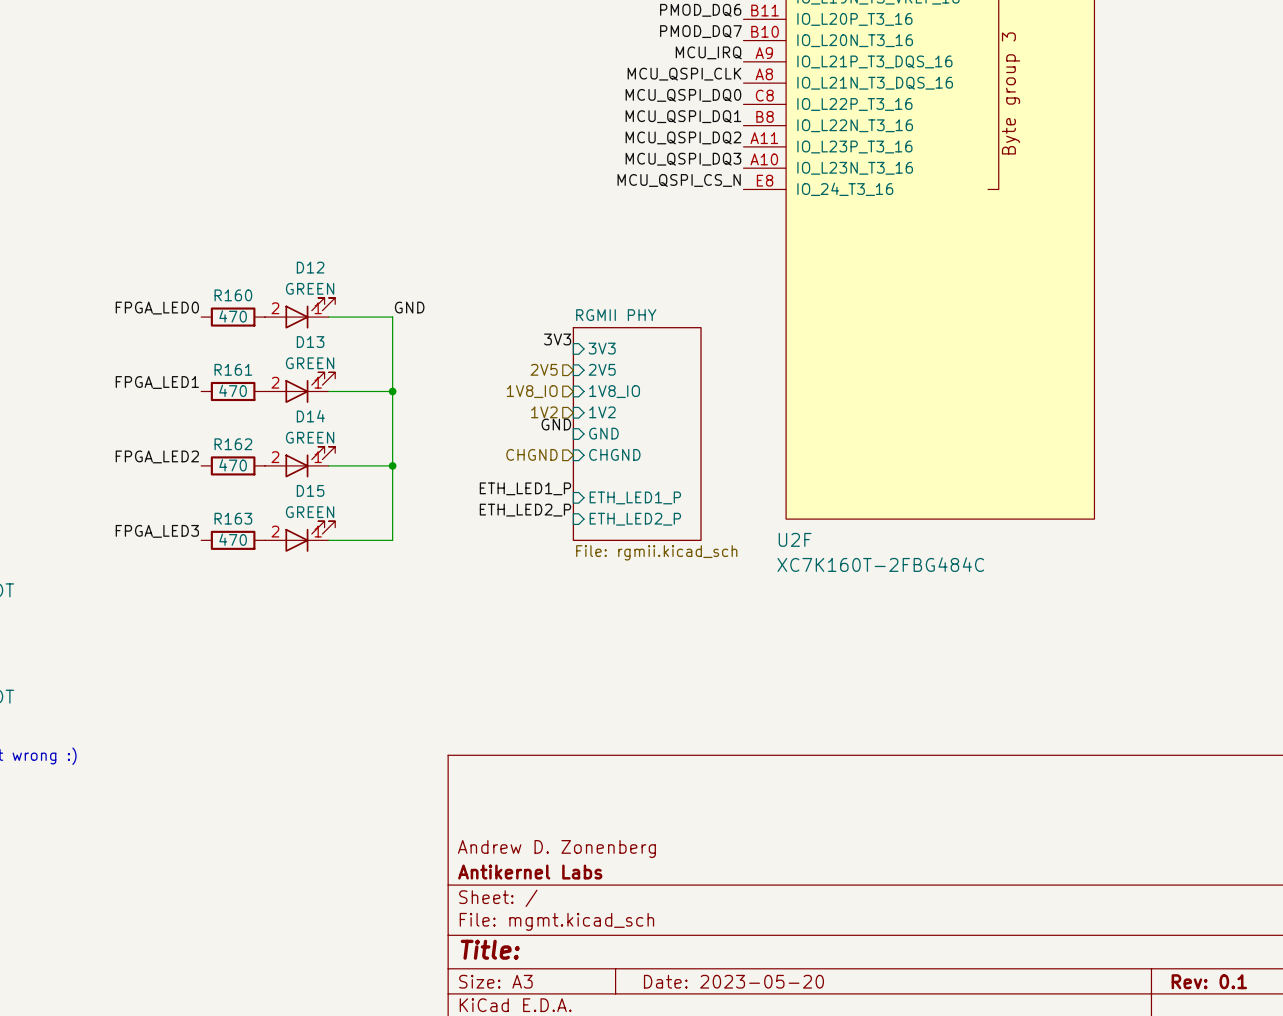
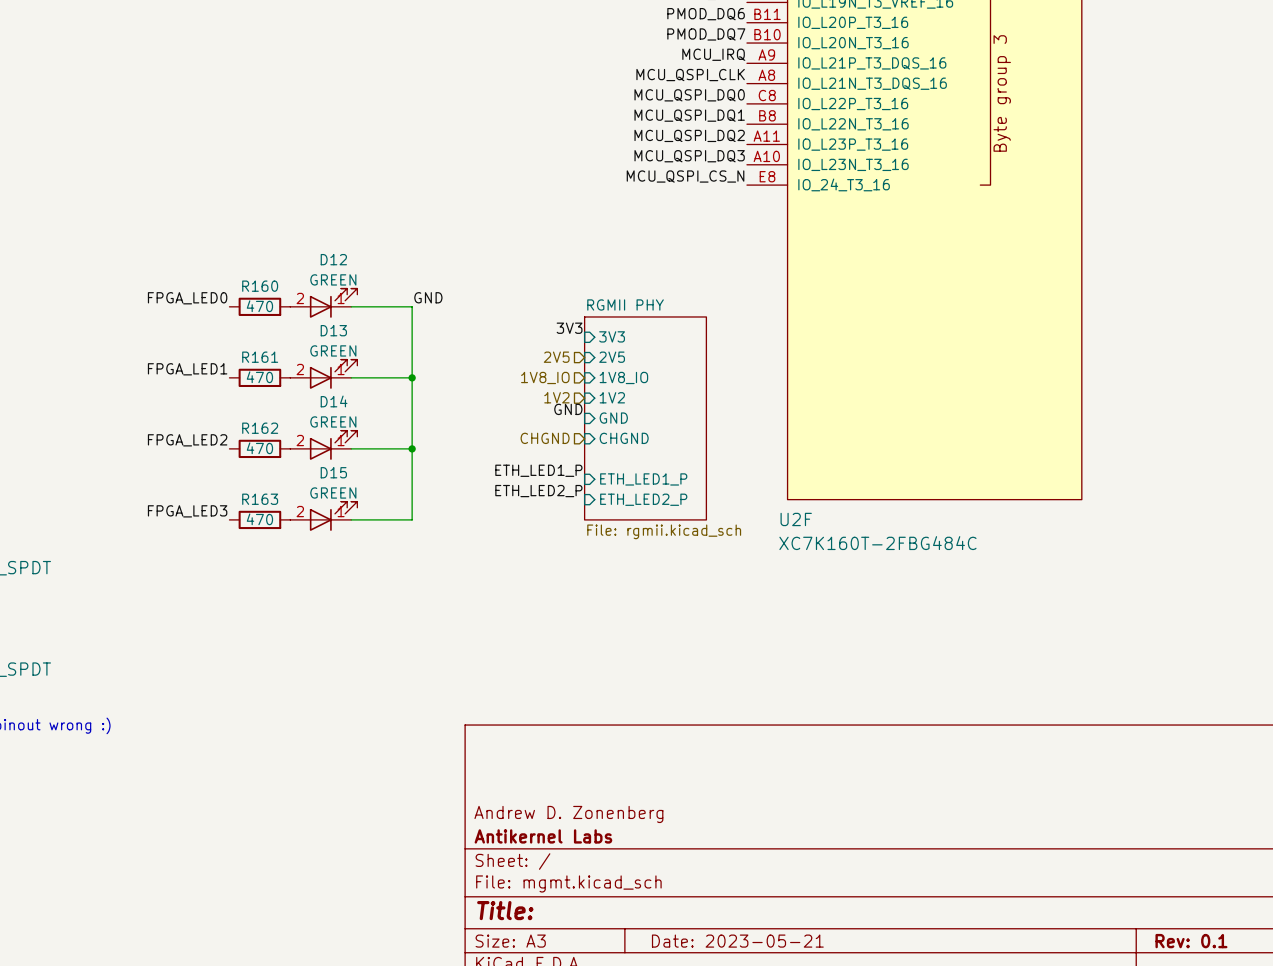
title block: Date: 2023-05-20 (733, 981) -> Date: 2023-05-21 (737, 941)

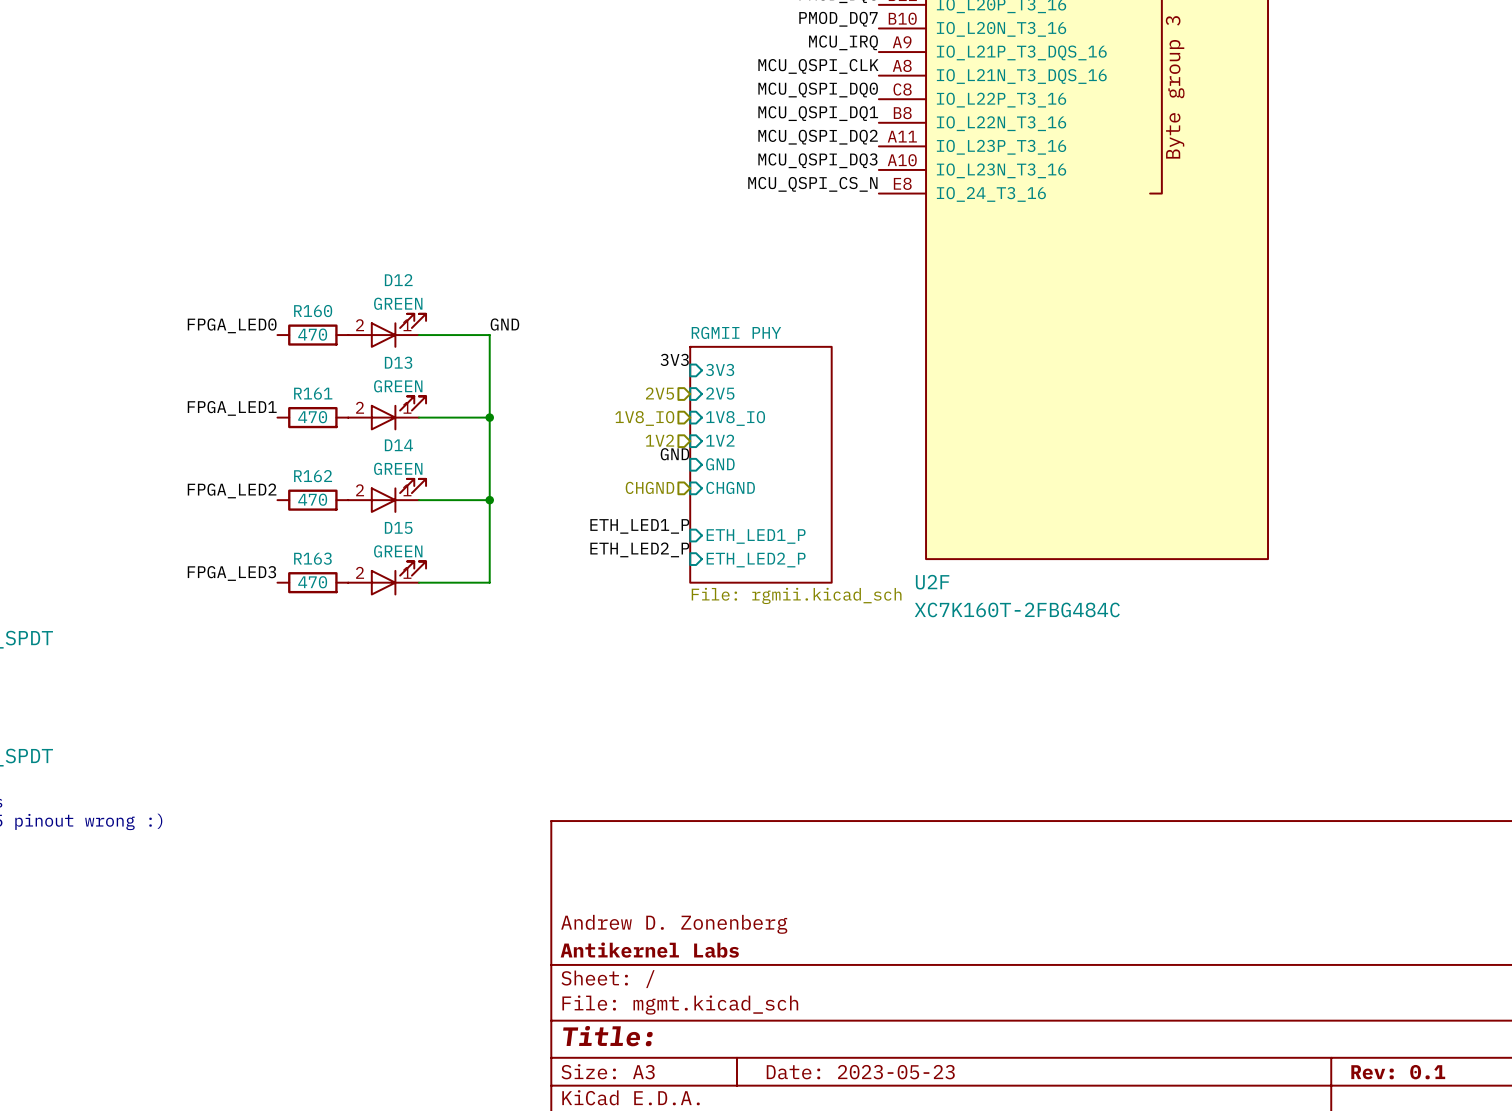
title block: Date: 2023-05-21 (737, 941) -> Date: 2023-05-23 (860, 1072)

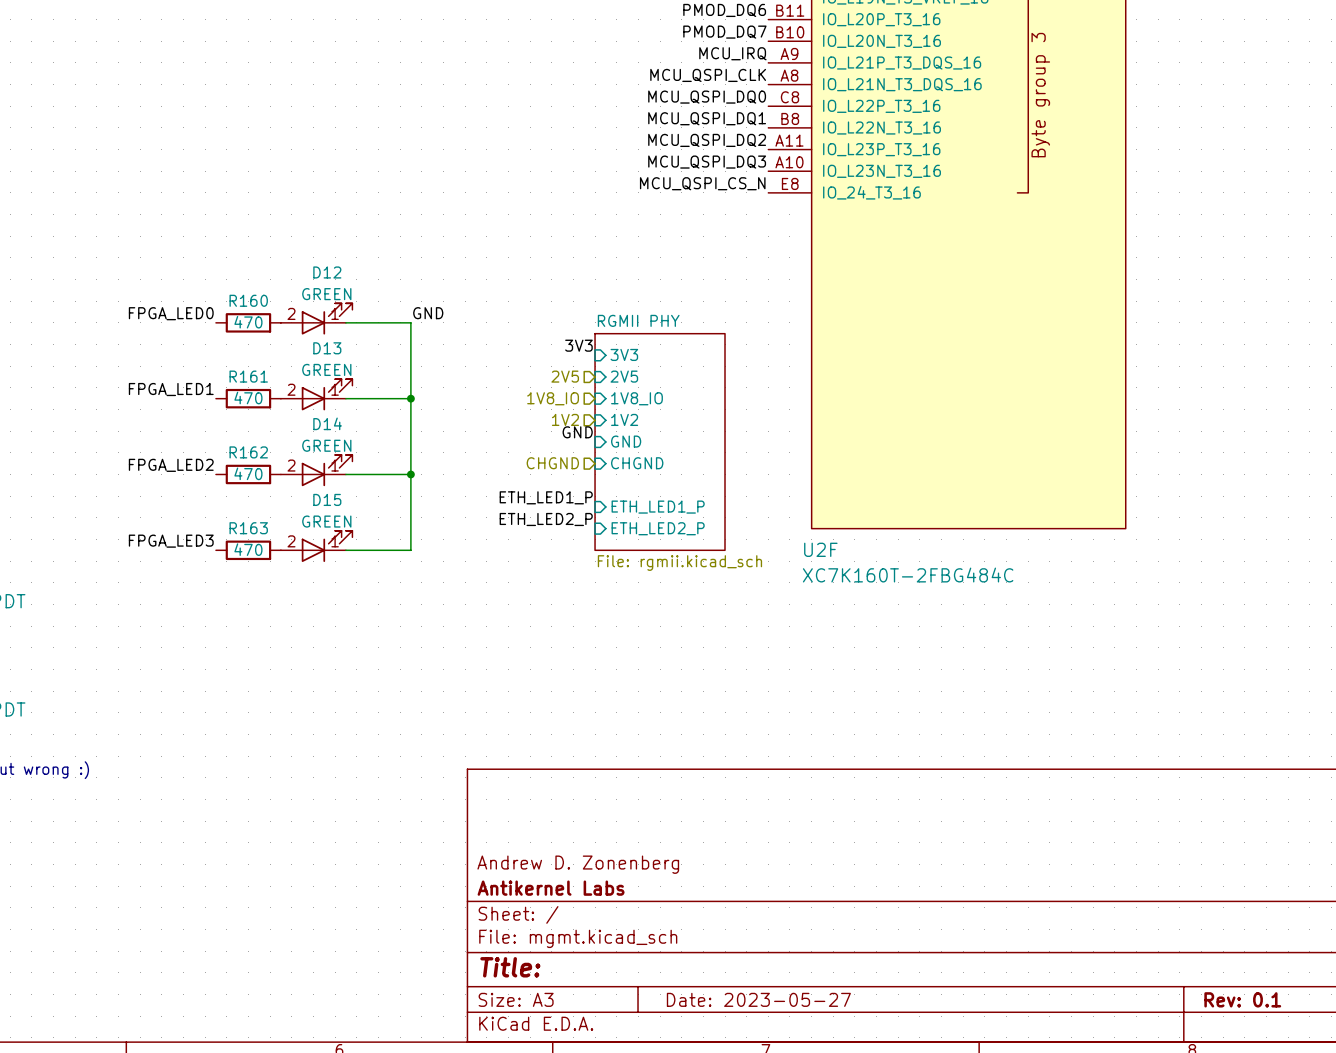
title block: Date: 2023-05-23 (860, 1072) -> Date: 2023-05-27 (758, 999)

